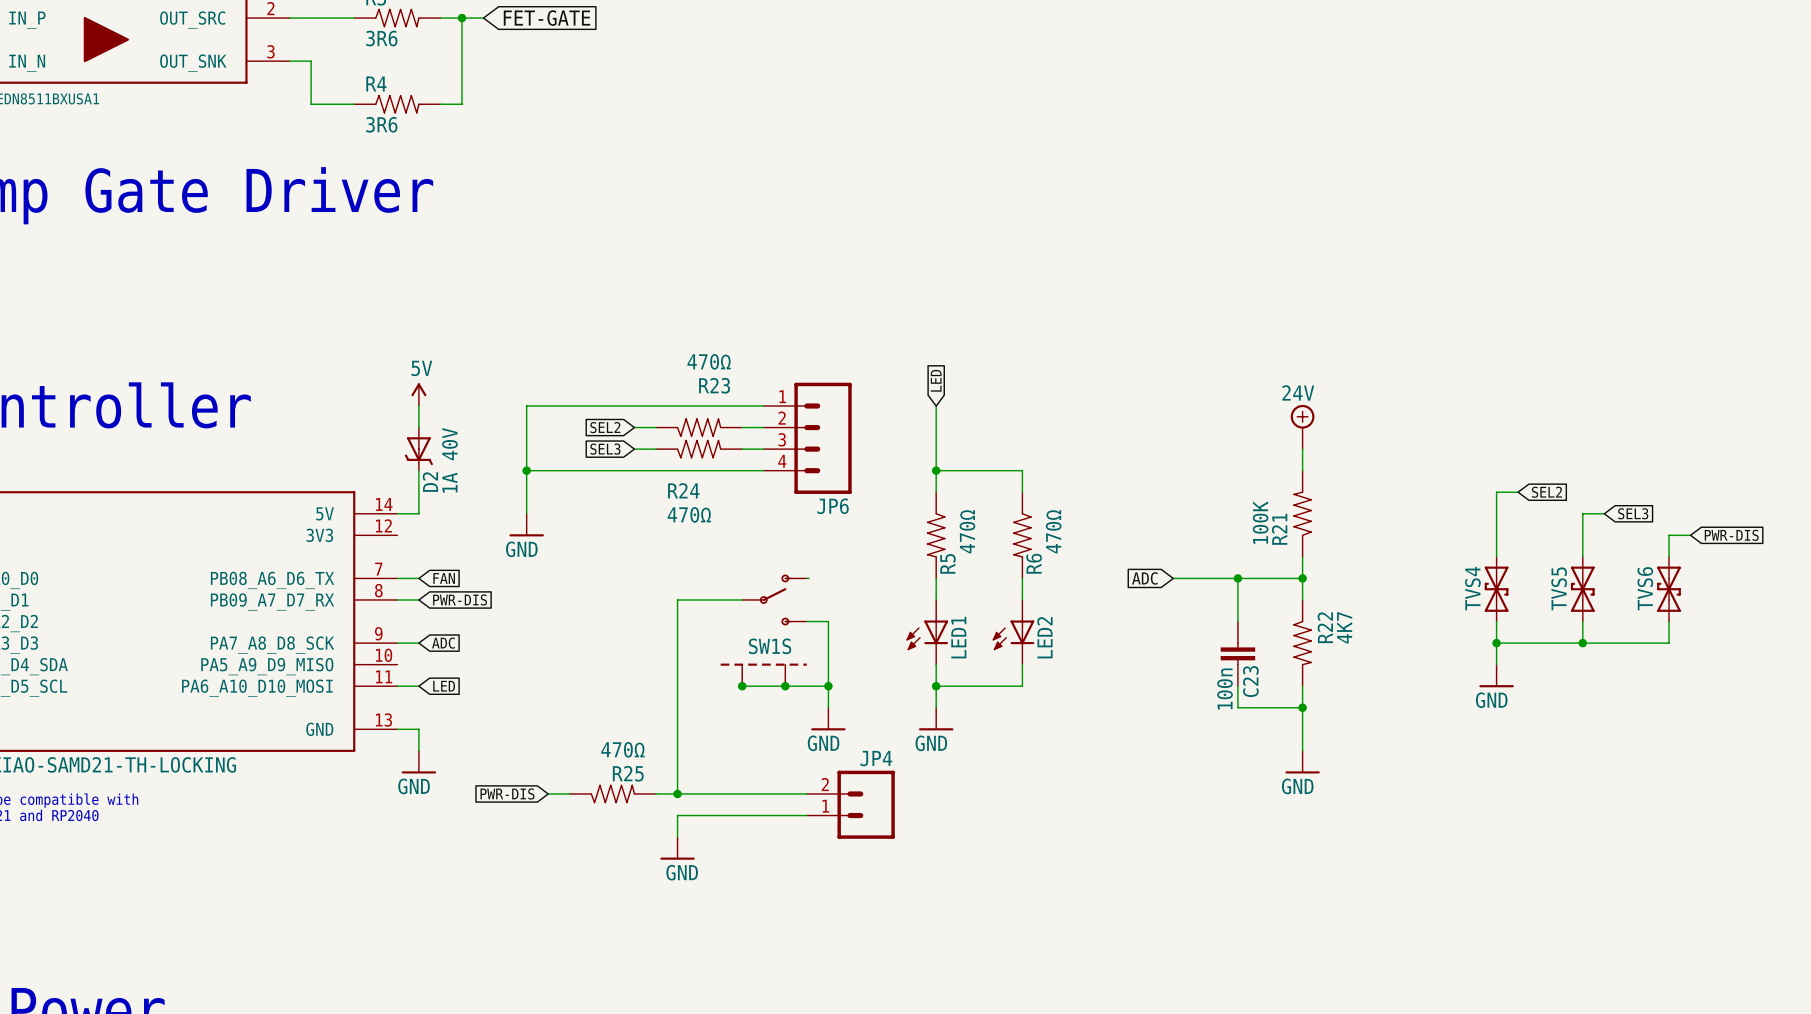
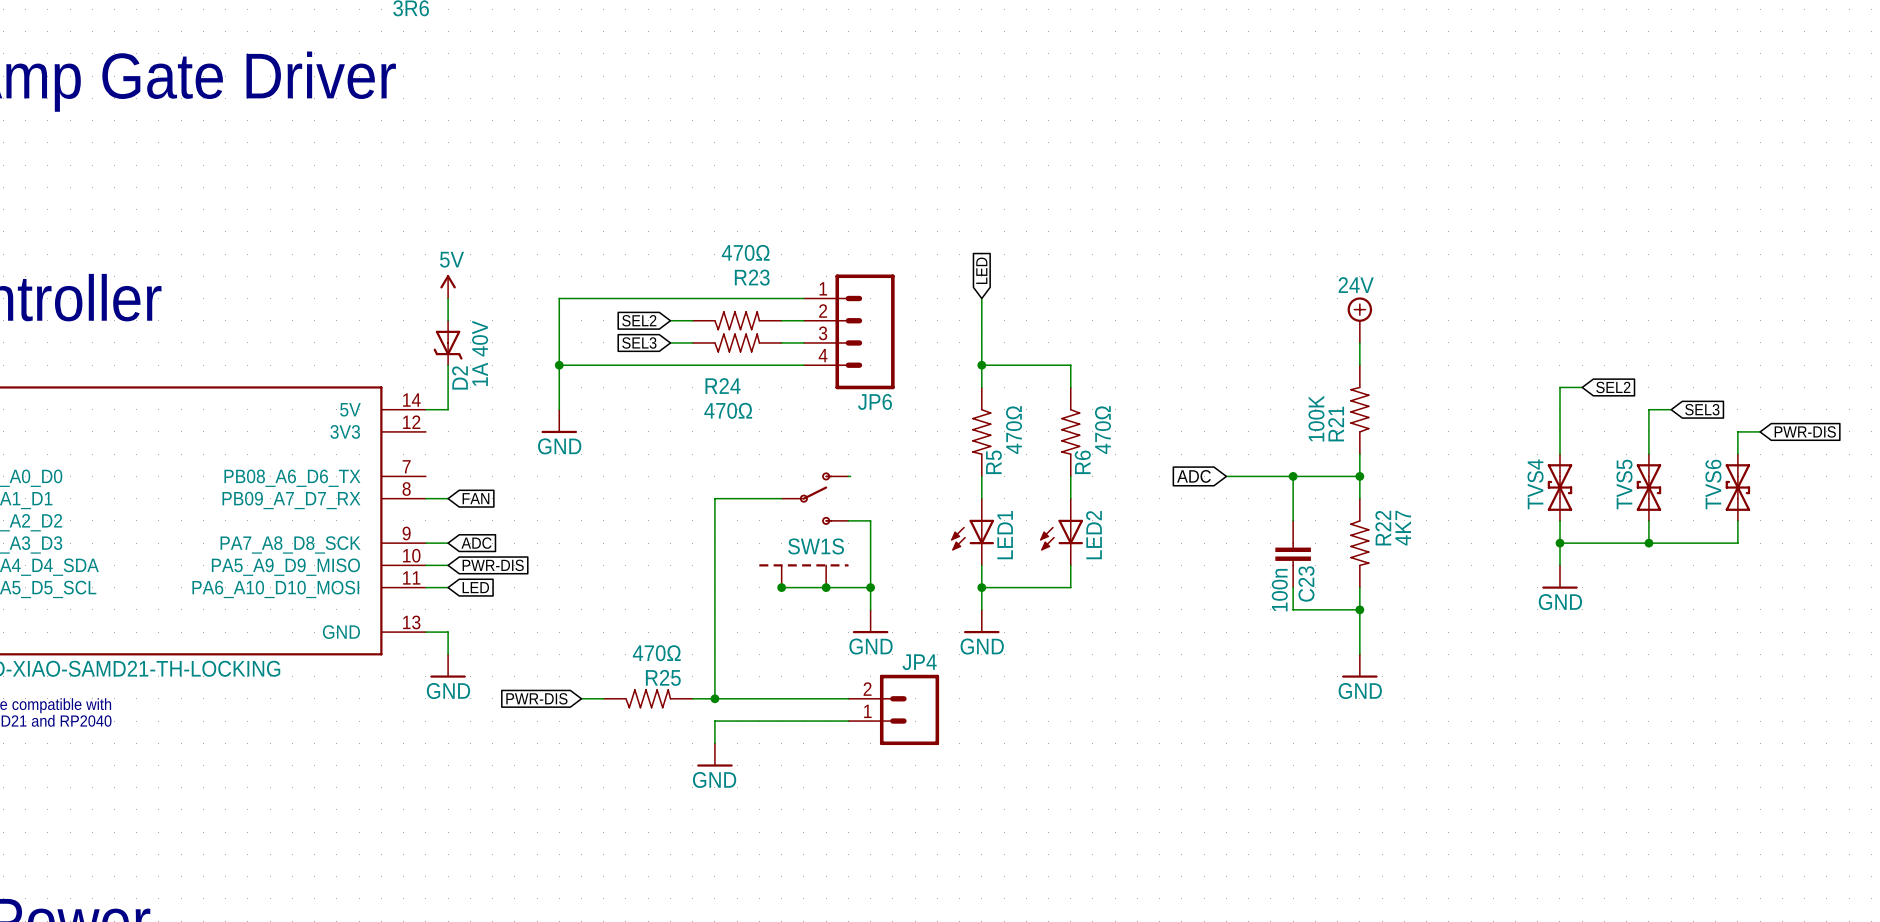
wire: (397, 578) (418, 578) -> (425, 565) (448, 565)
global label: FAN (444, 578) -> none
global label: PWR-DIS (460, 600) -> FAN (475, 498)
global label: none -> PWR-DIS (493, 565)

